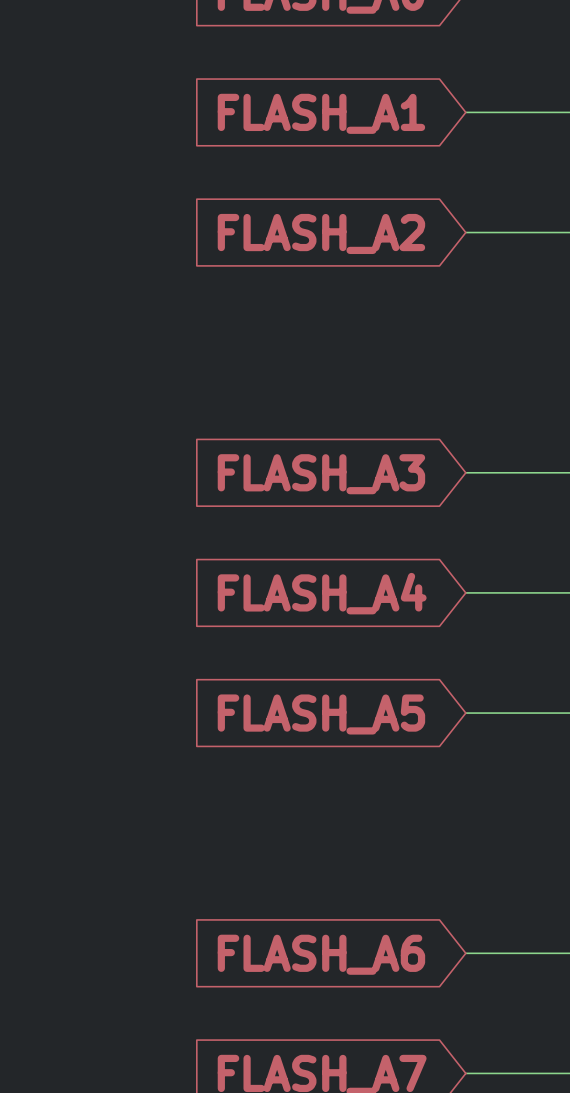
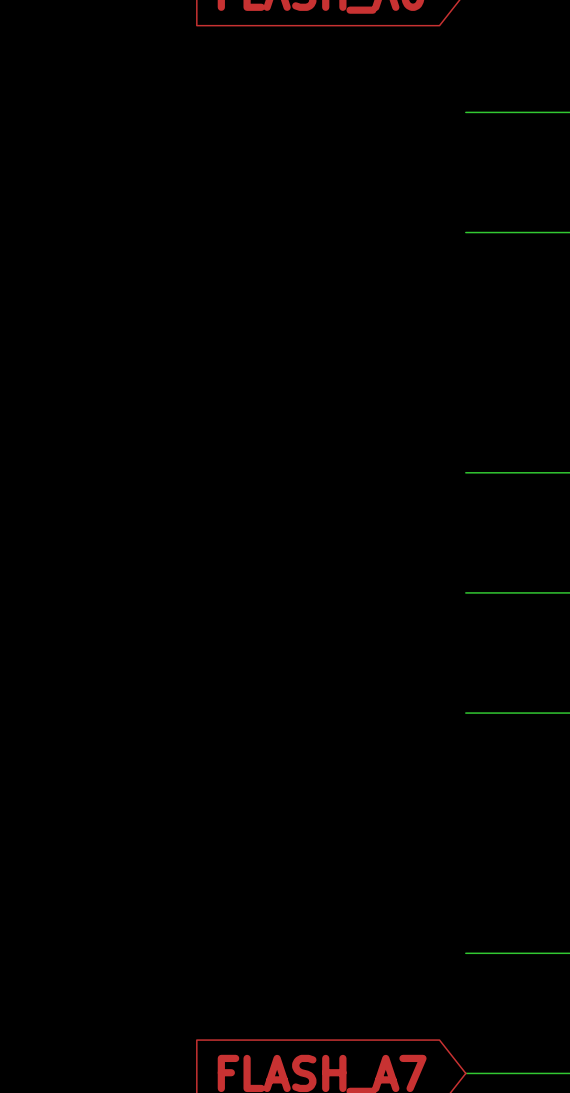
global label: FLASH_A1 (321, 113) -> none
global label: FLASH_A2 (321, 233) -> none
global label: FLASH_A3 (321, 474) -> none
global label: FLASH_A4 (322, 593) -> none
global label: FLASH_A5 (321, 714) -> none
global label: FLASH_A6 (321, 954) -> none

